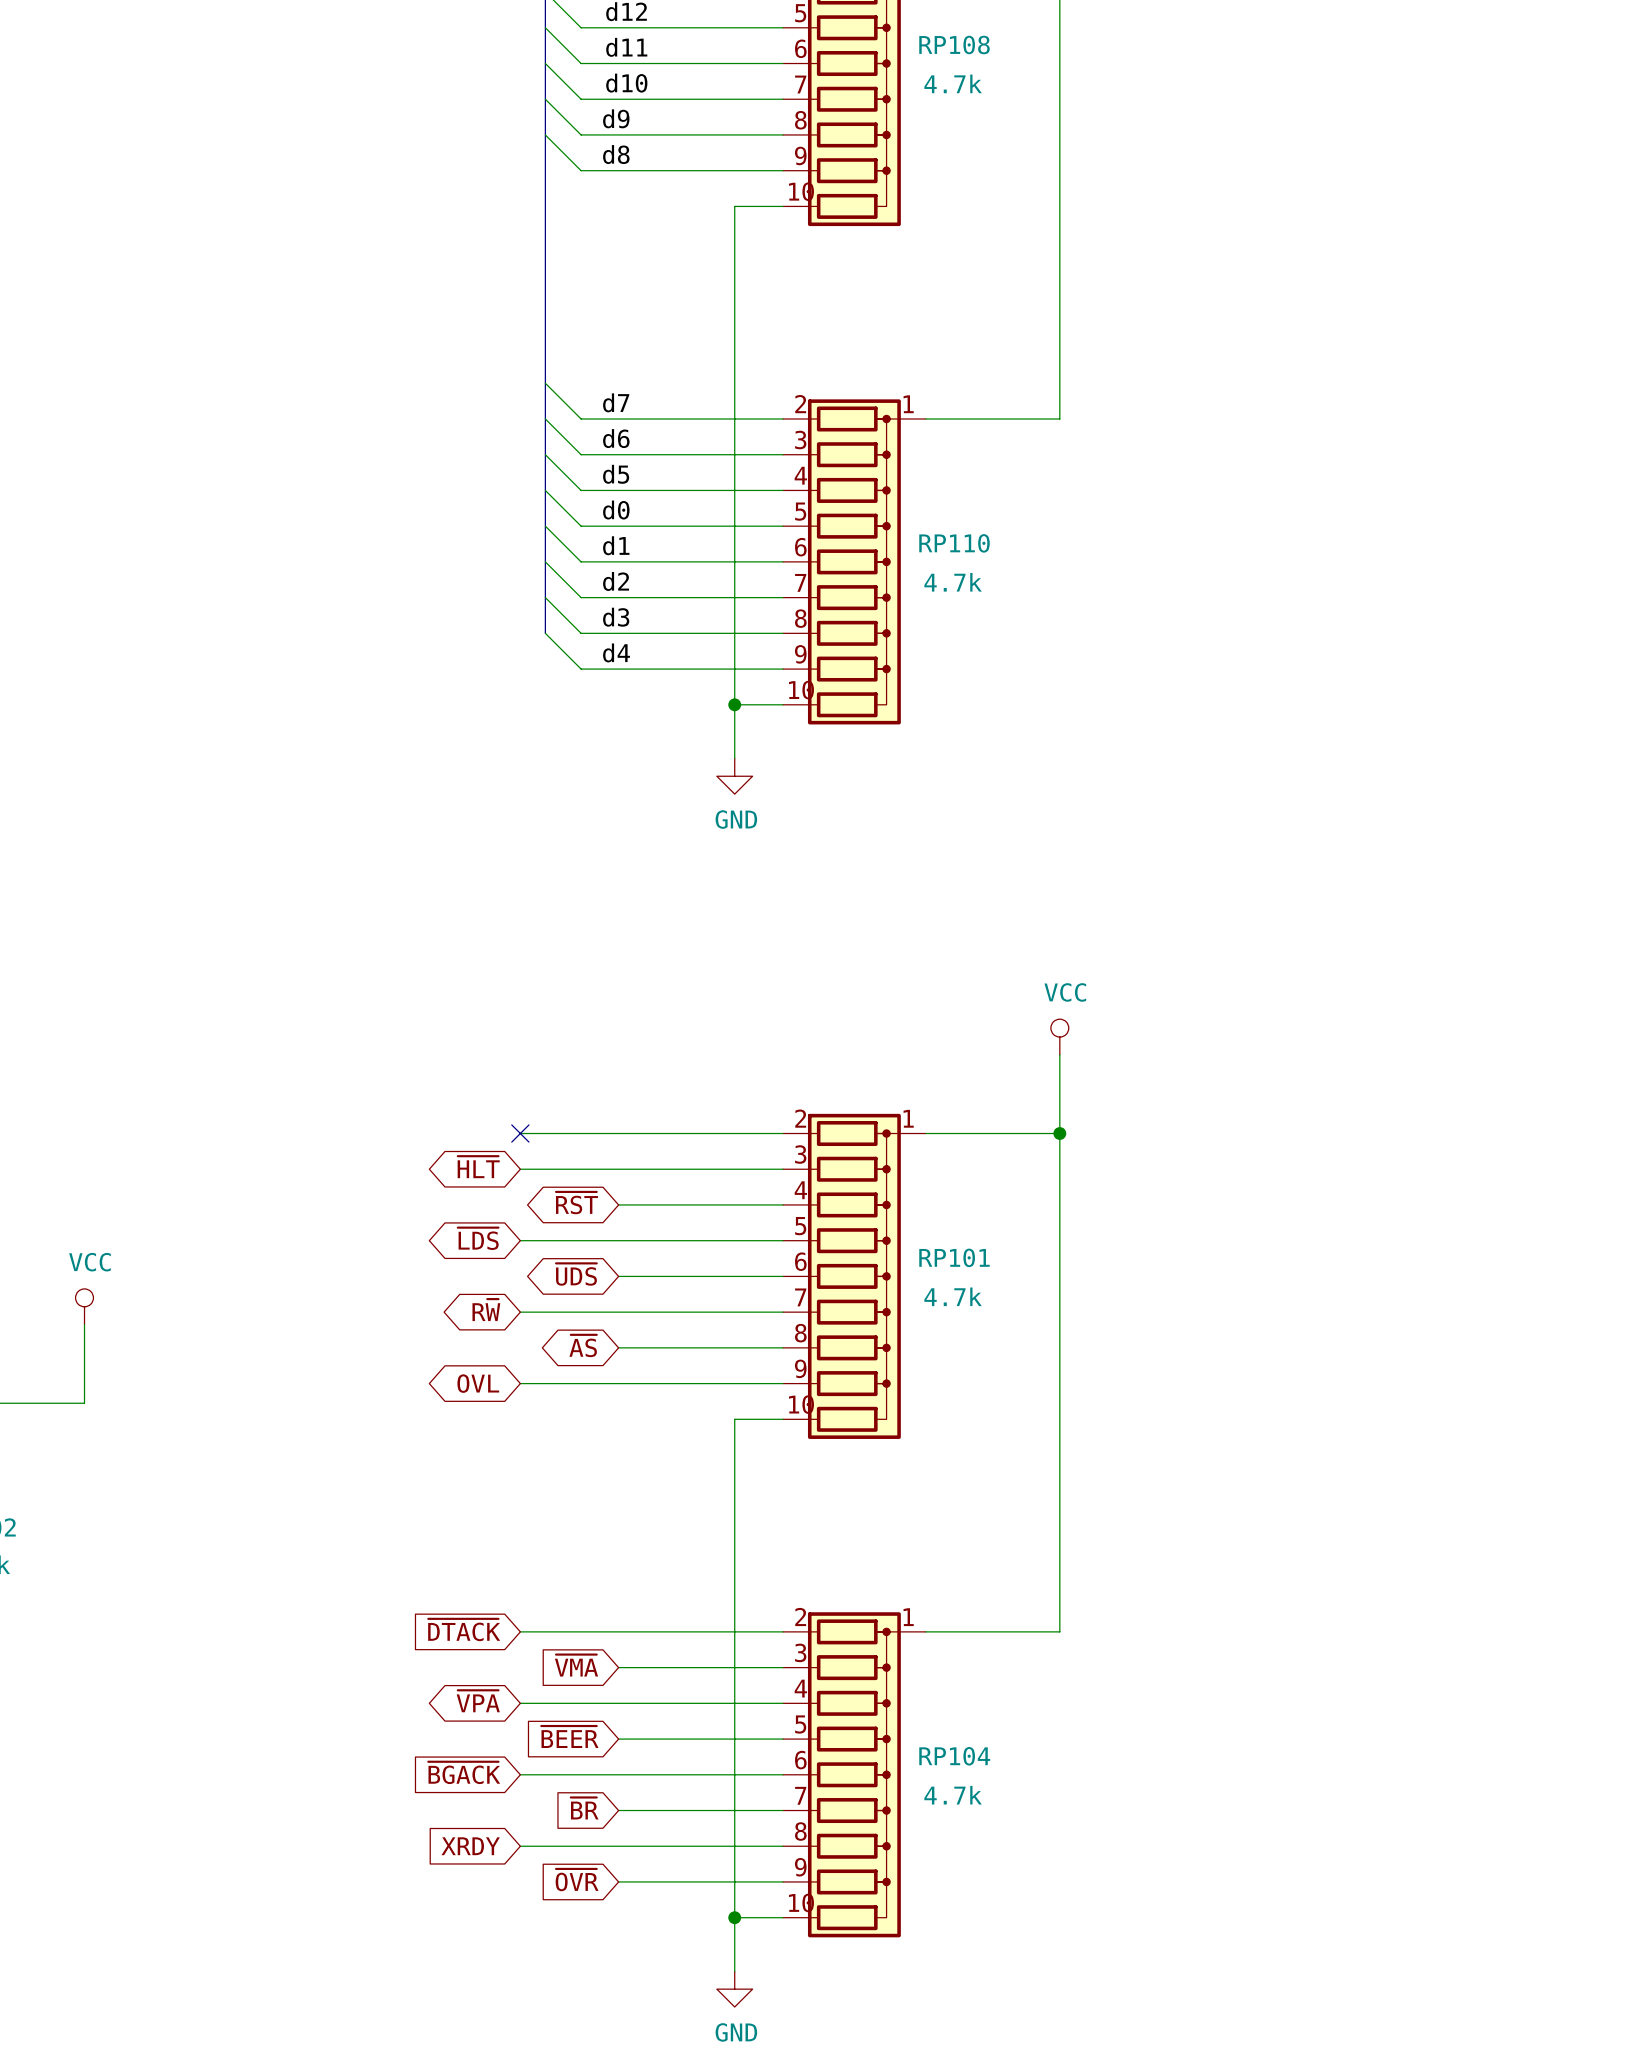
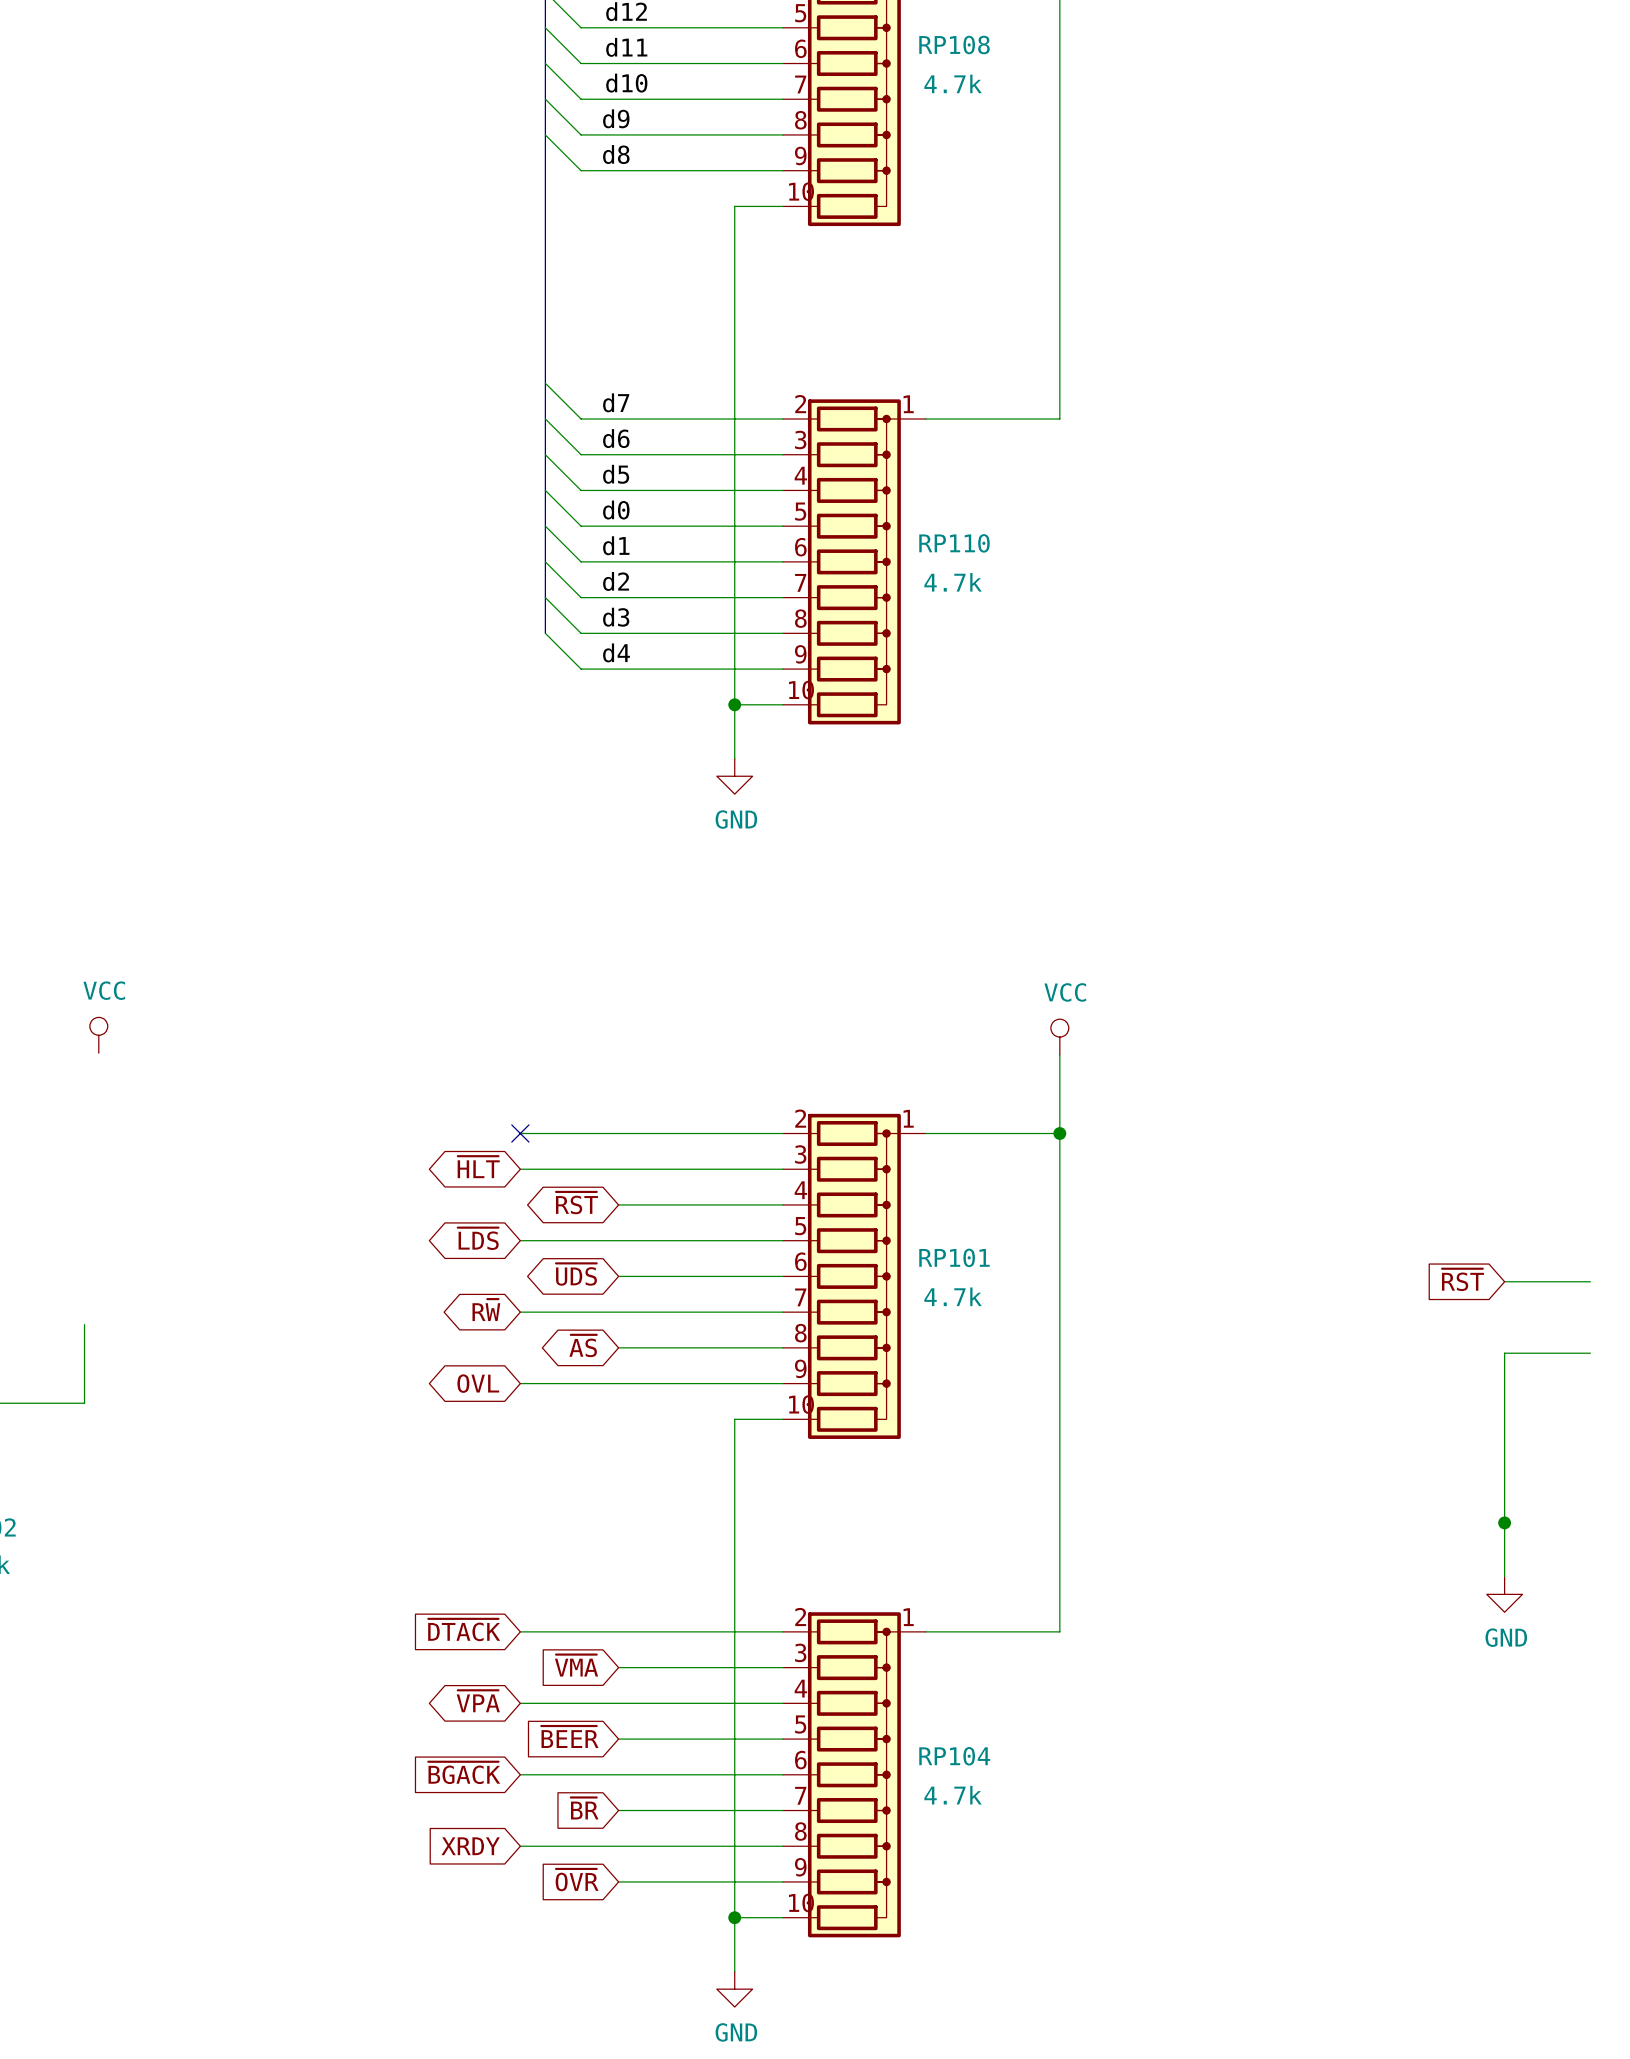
power symbol: none -> VCC (98, 1035)
global label: none -> ~{RST} (1462, 1279)
wire: none -> (1504, 1281) (1590, 1281)
power symbol: VCC (84, 1306) -> none
wire: none -> (1590, 1353) (1504, 1353) (1504, 1576)
junction: none -> (1504, 1522)
power symbol: none -> GND (1504, 1594)

